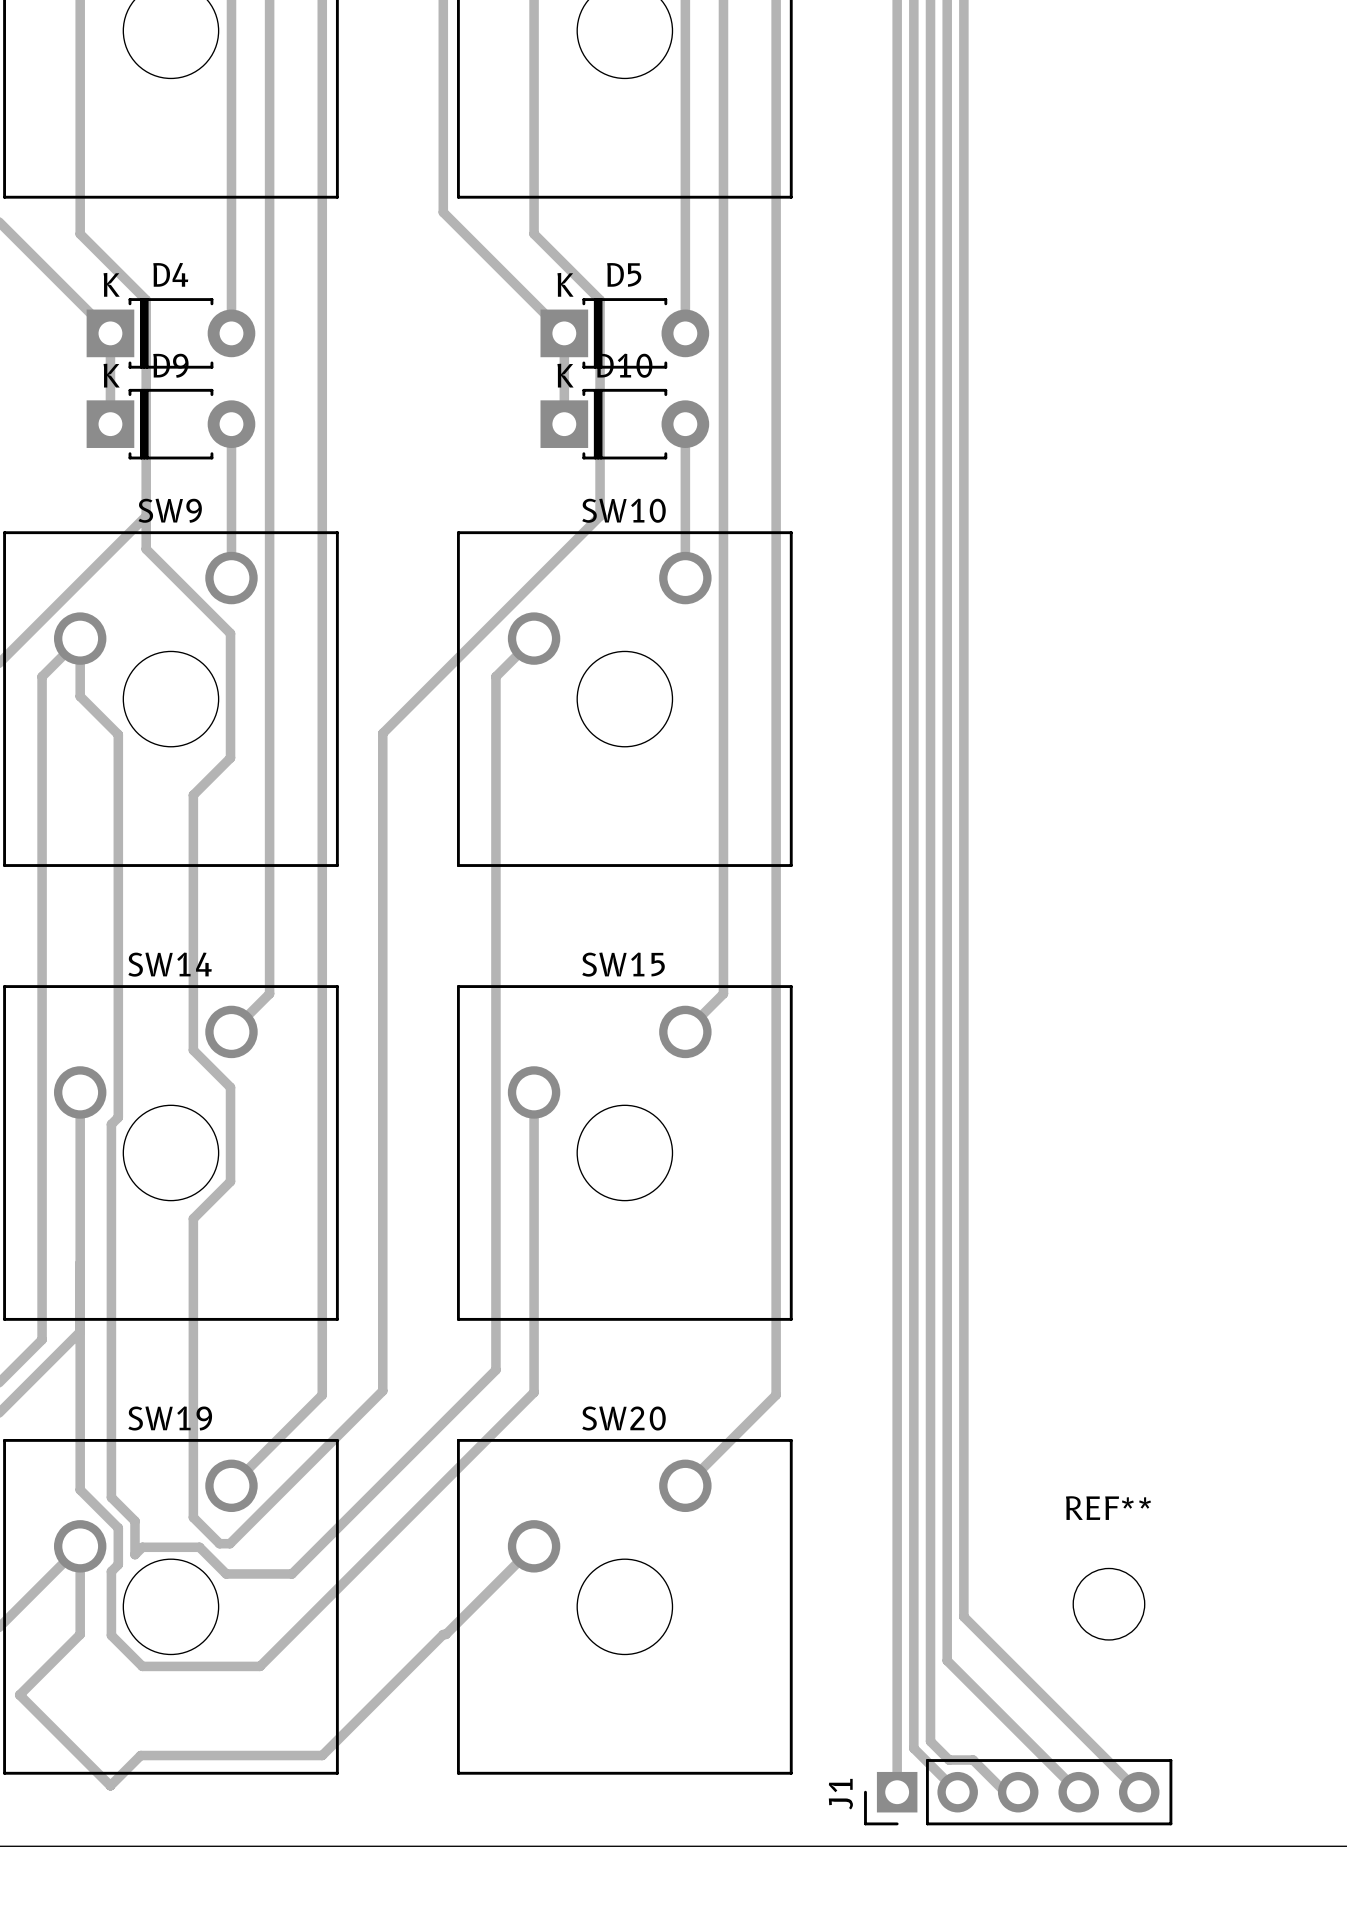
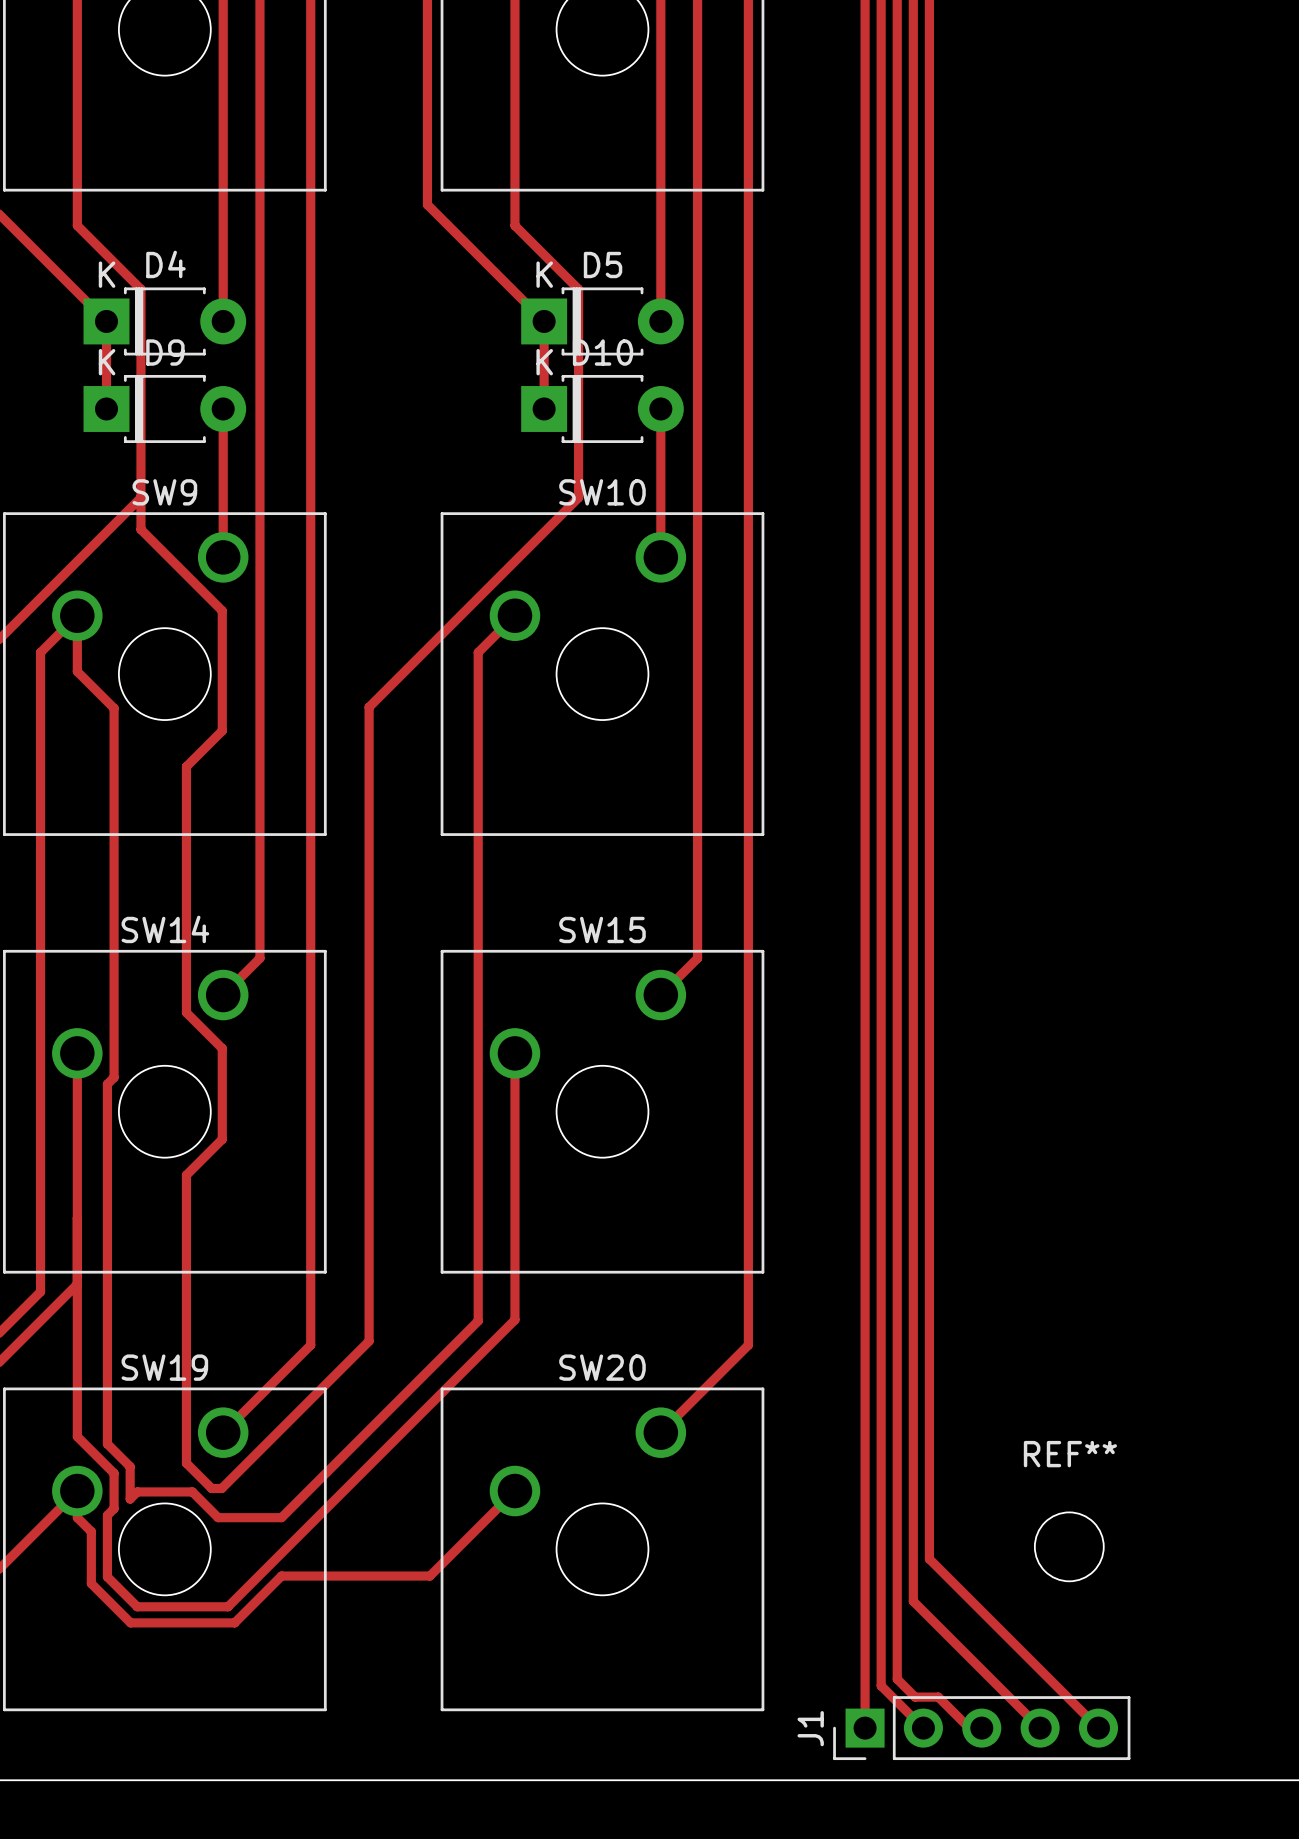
track: (534, 1368) (534, 1392) (292, 1634) -> (514, 1319) (228, 1606)
track: (80, 1573) (80, 1634) (19, 1695) (110, 1785) (140, 1755) (322, 1755) (443, 1634) -> (281, 1576) (427, 1576)
track: (236, 1666) (260, 1666) -> (77, 1517) (91, 1531) (91, 1583) (130, 1622) (234, 1622) (250, 1606)

